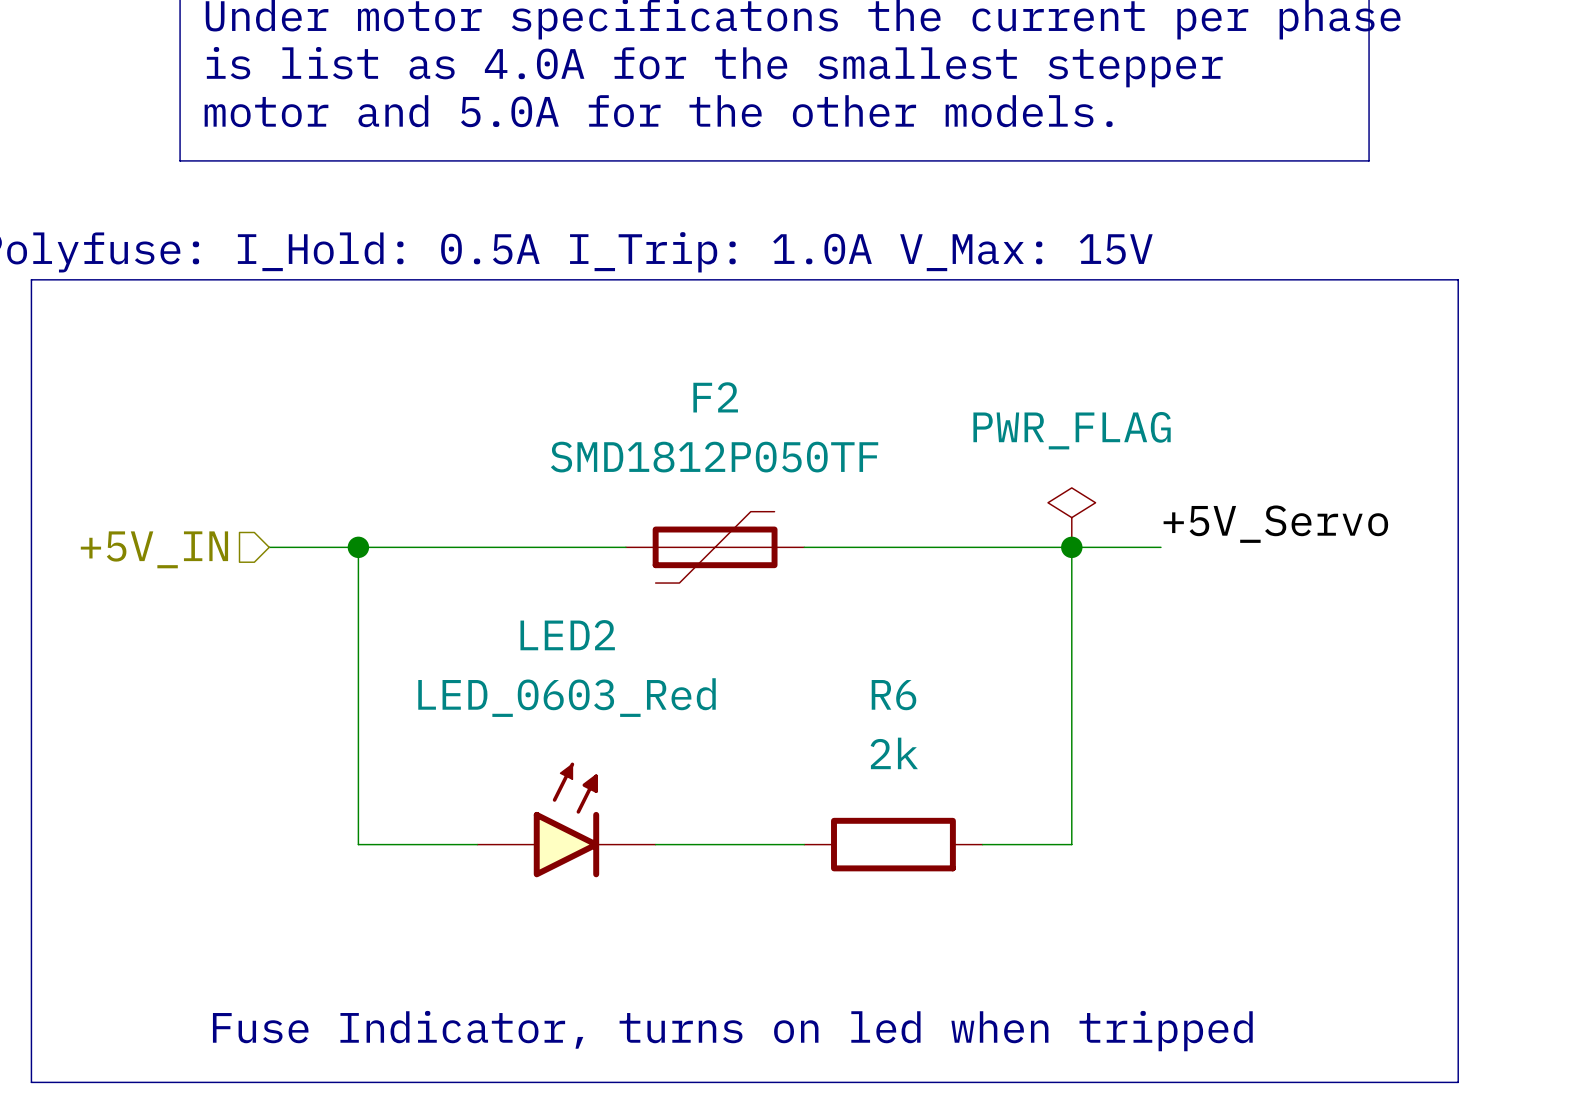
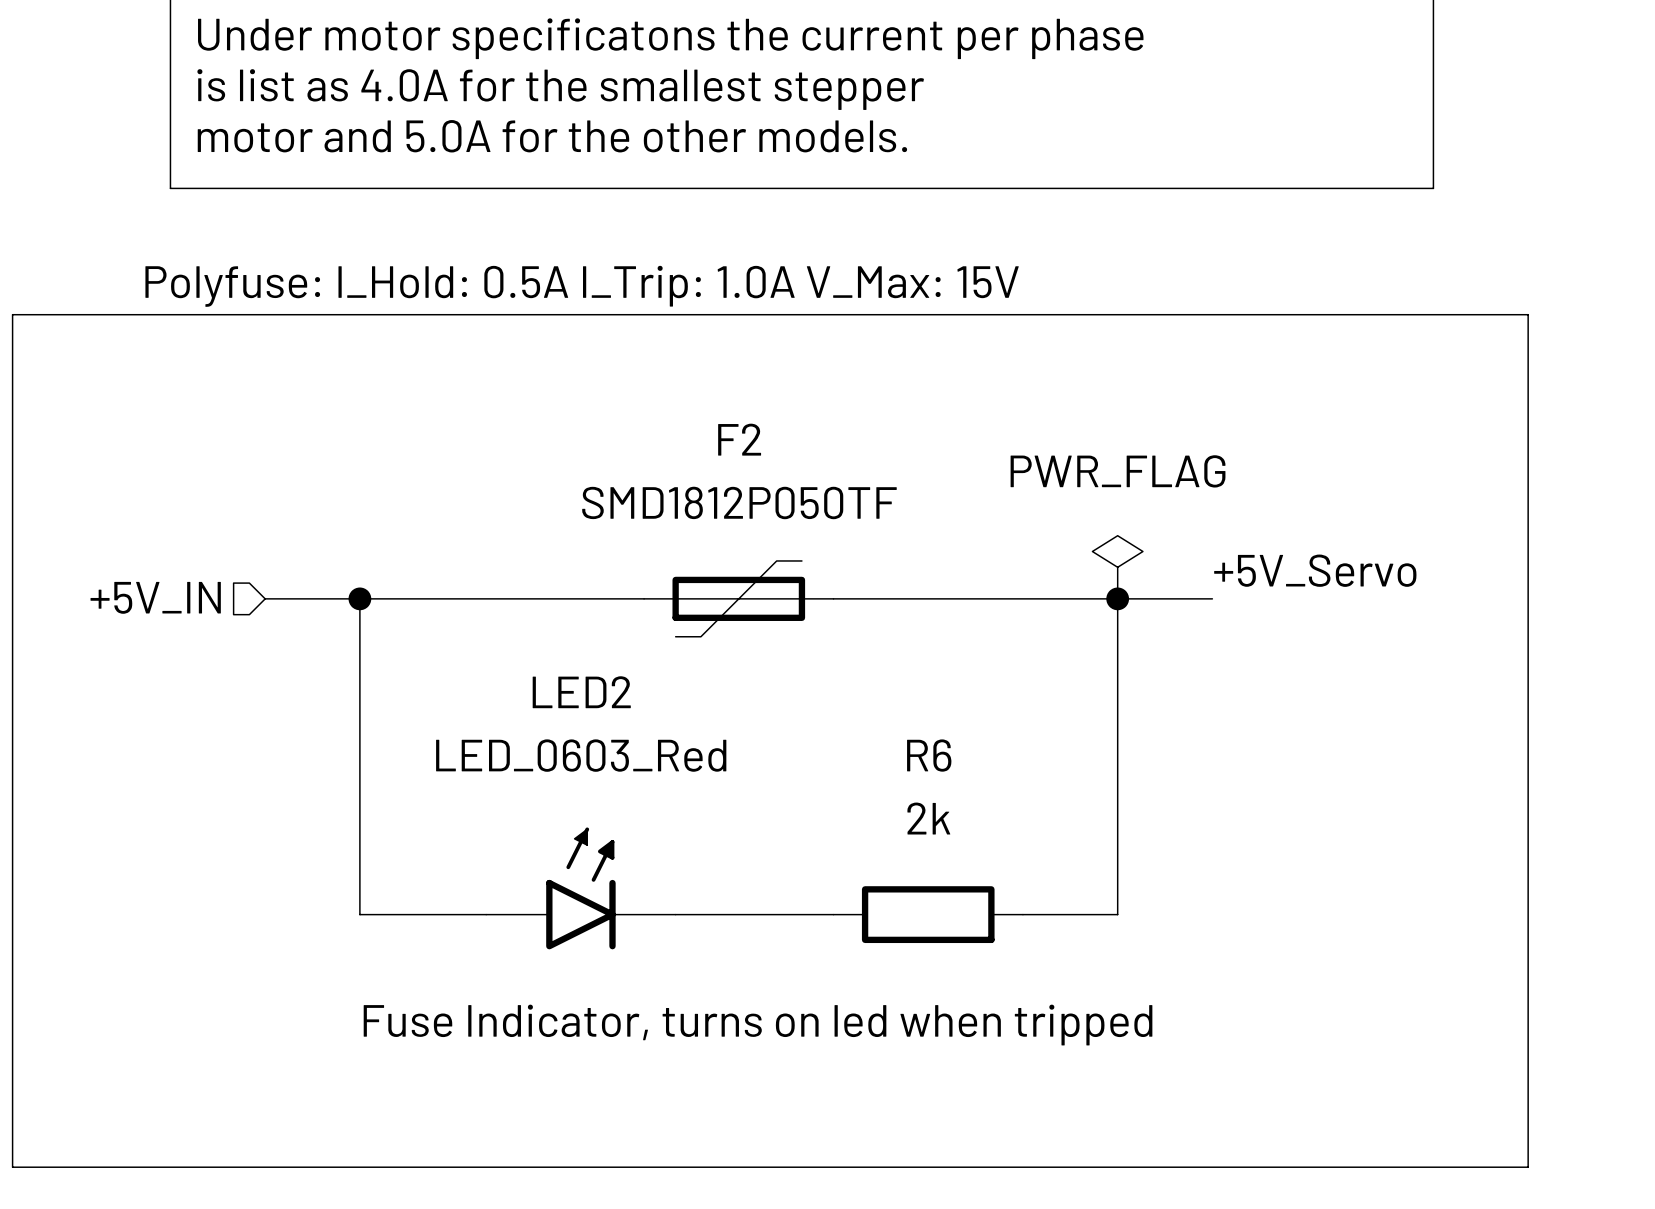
text position: Fuse Indicator, turns on led when tripped (732, 1031) -> Fuse Indicator, turns on led when tripped (758, 1025)

